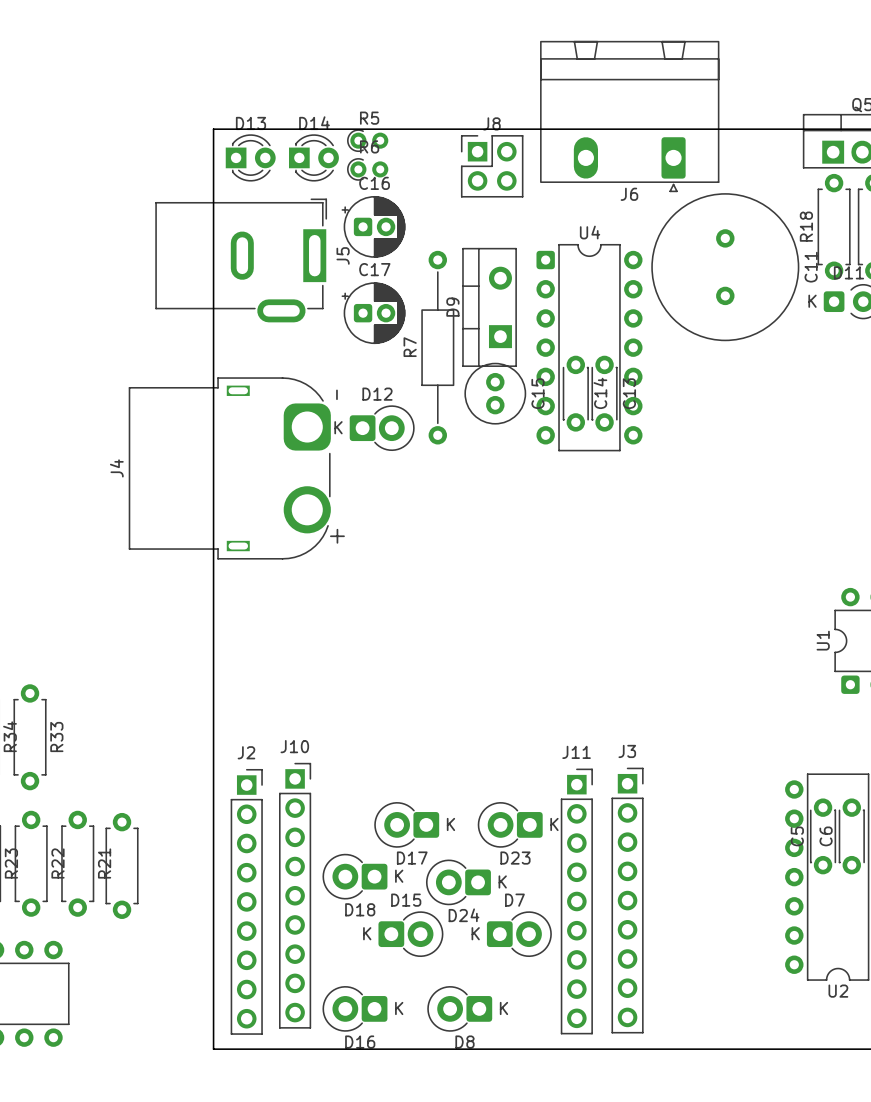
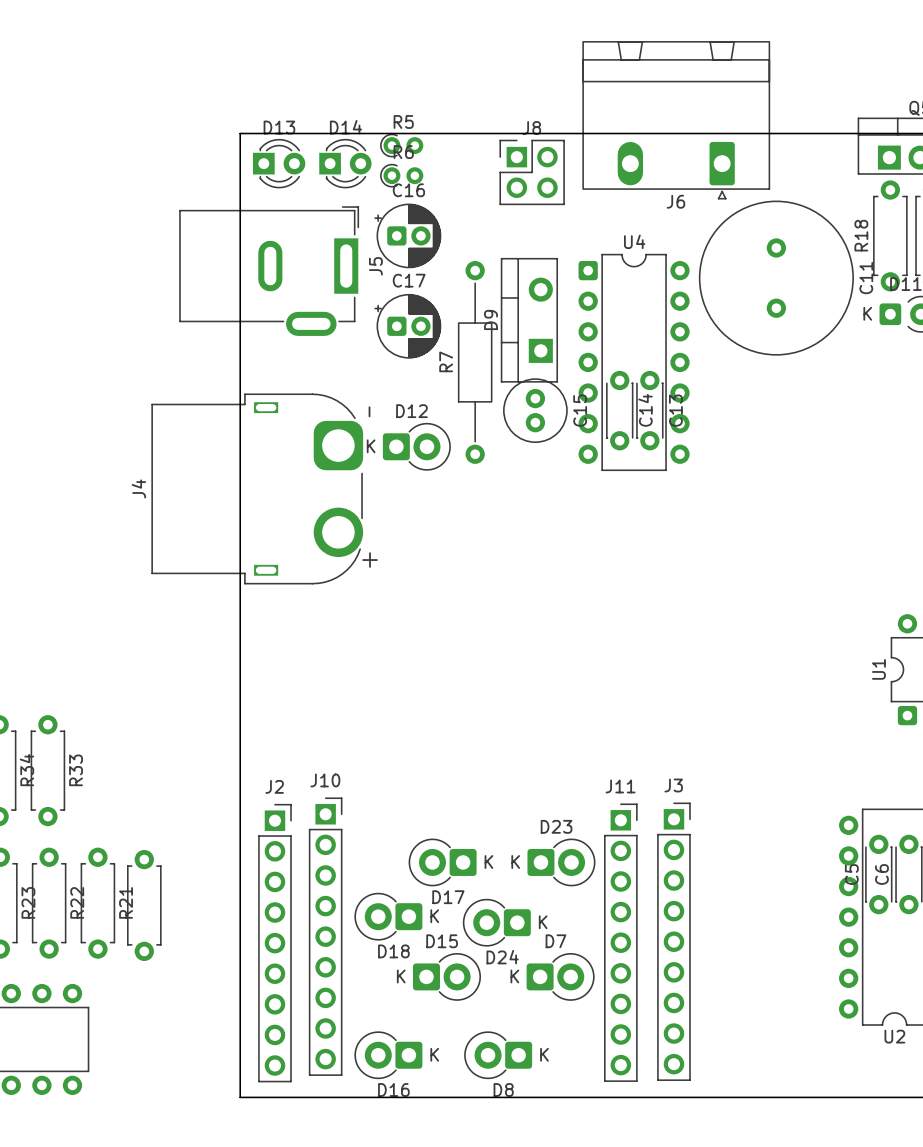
D23 rotation: 0° (510, 824) -> 180° (561, 862)

